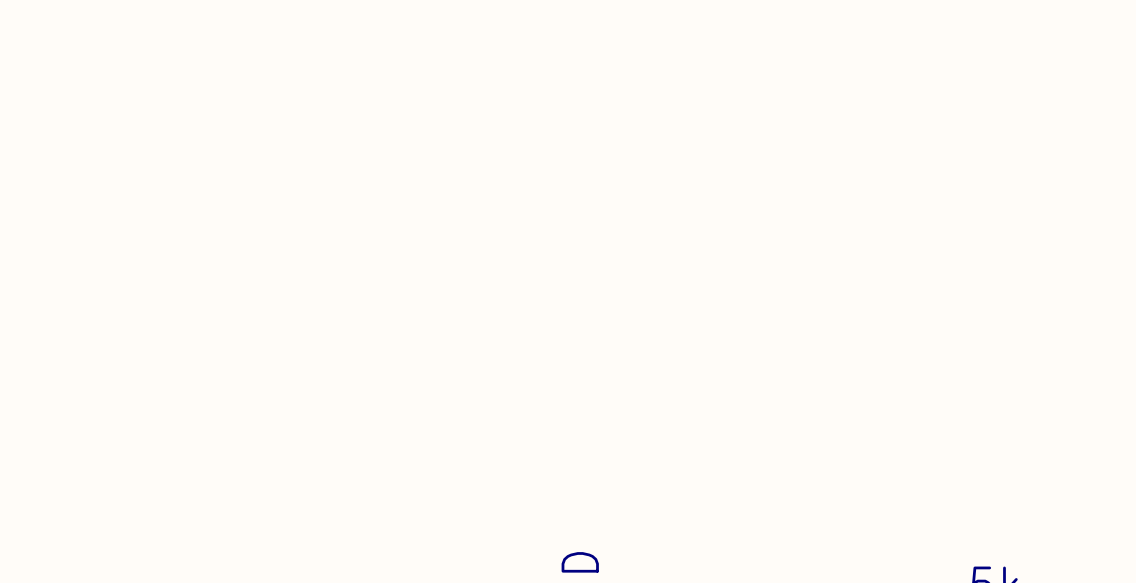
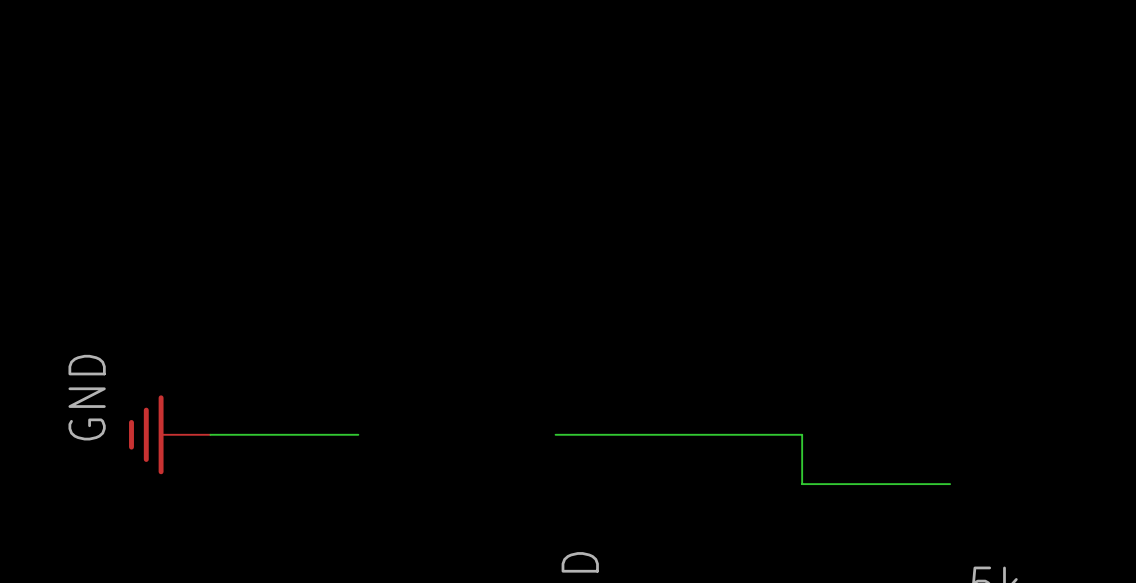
power symbol: none -> GND (169, 434)
wire: none -> (210, 434) (358, 434)
wire: none -> (555, 434) (802, 434) (802, 484) (950, 484)

